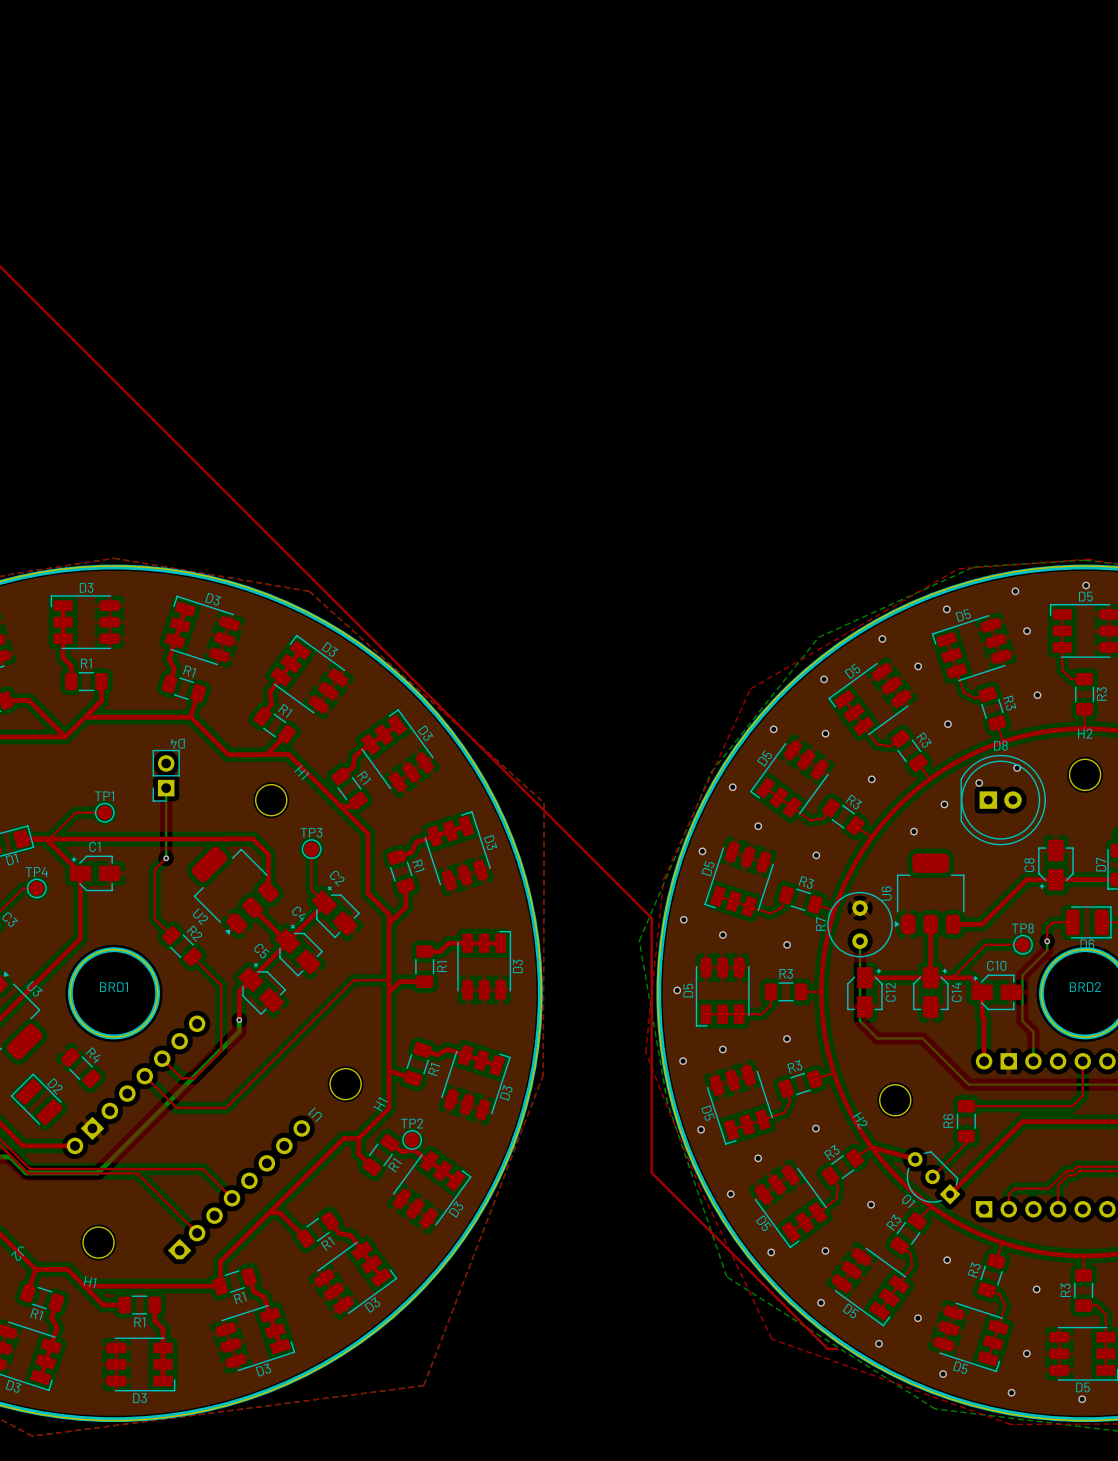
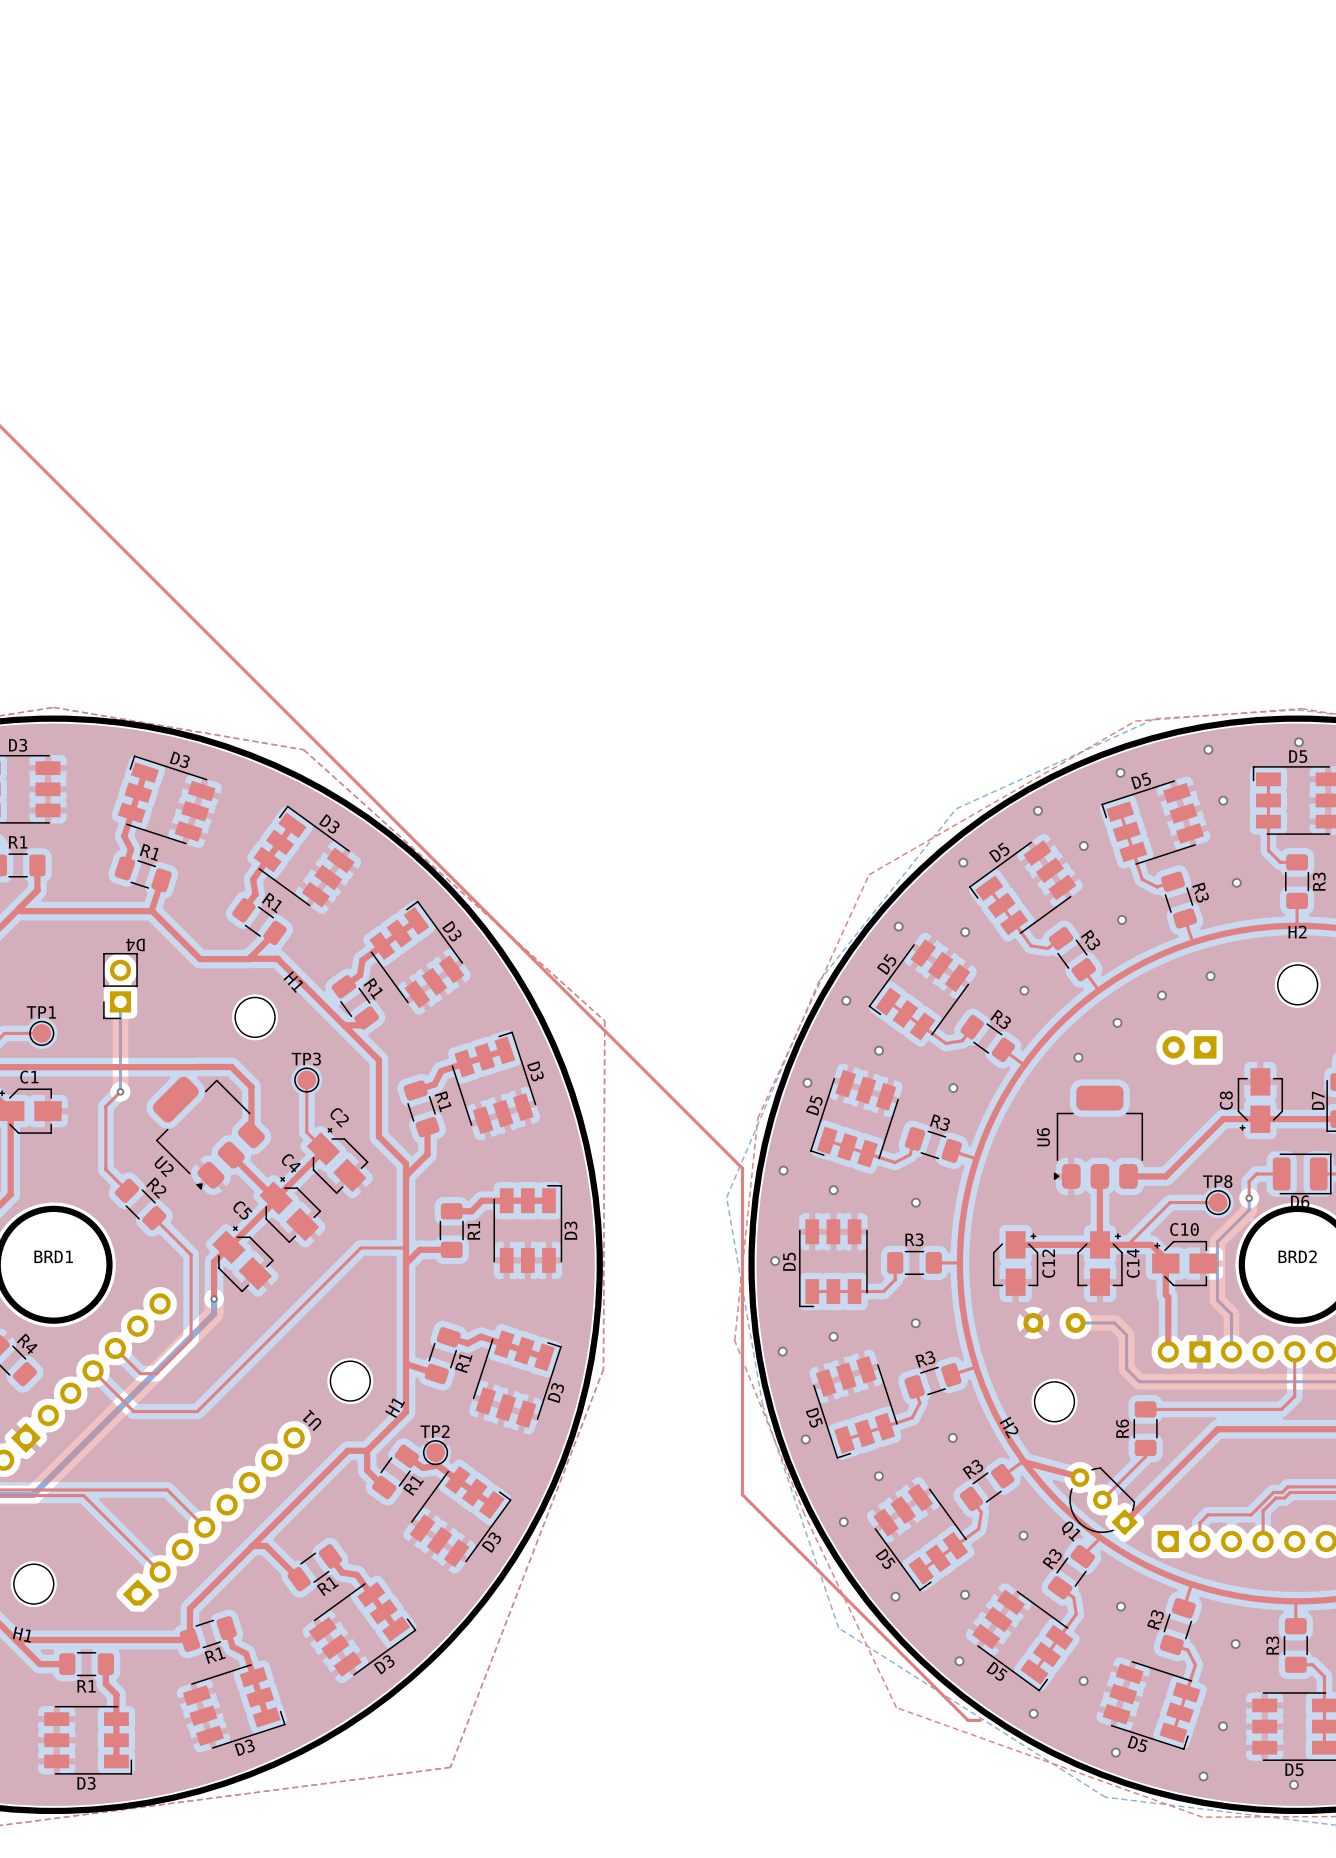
D8 side: top (1003, 800) -> bottom (1189, 1047)
R7 side: top (860, 924) -> bottom (1054, 1322)
bottom track: (860, 941) (860, 1021) (877, 1038) (922, 1038) (968, 1084) -> (1075, 1322) (1114, 1322) (1126, 1335) (1126, 1368) (1139, 1381) (1148, 1381)

